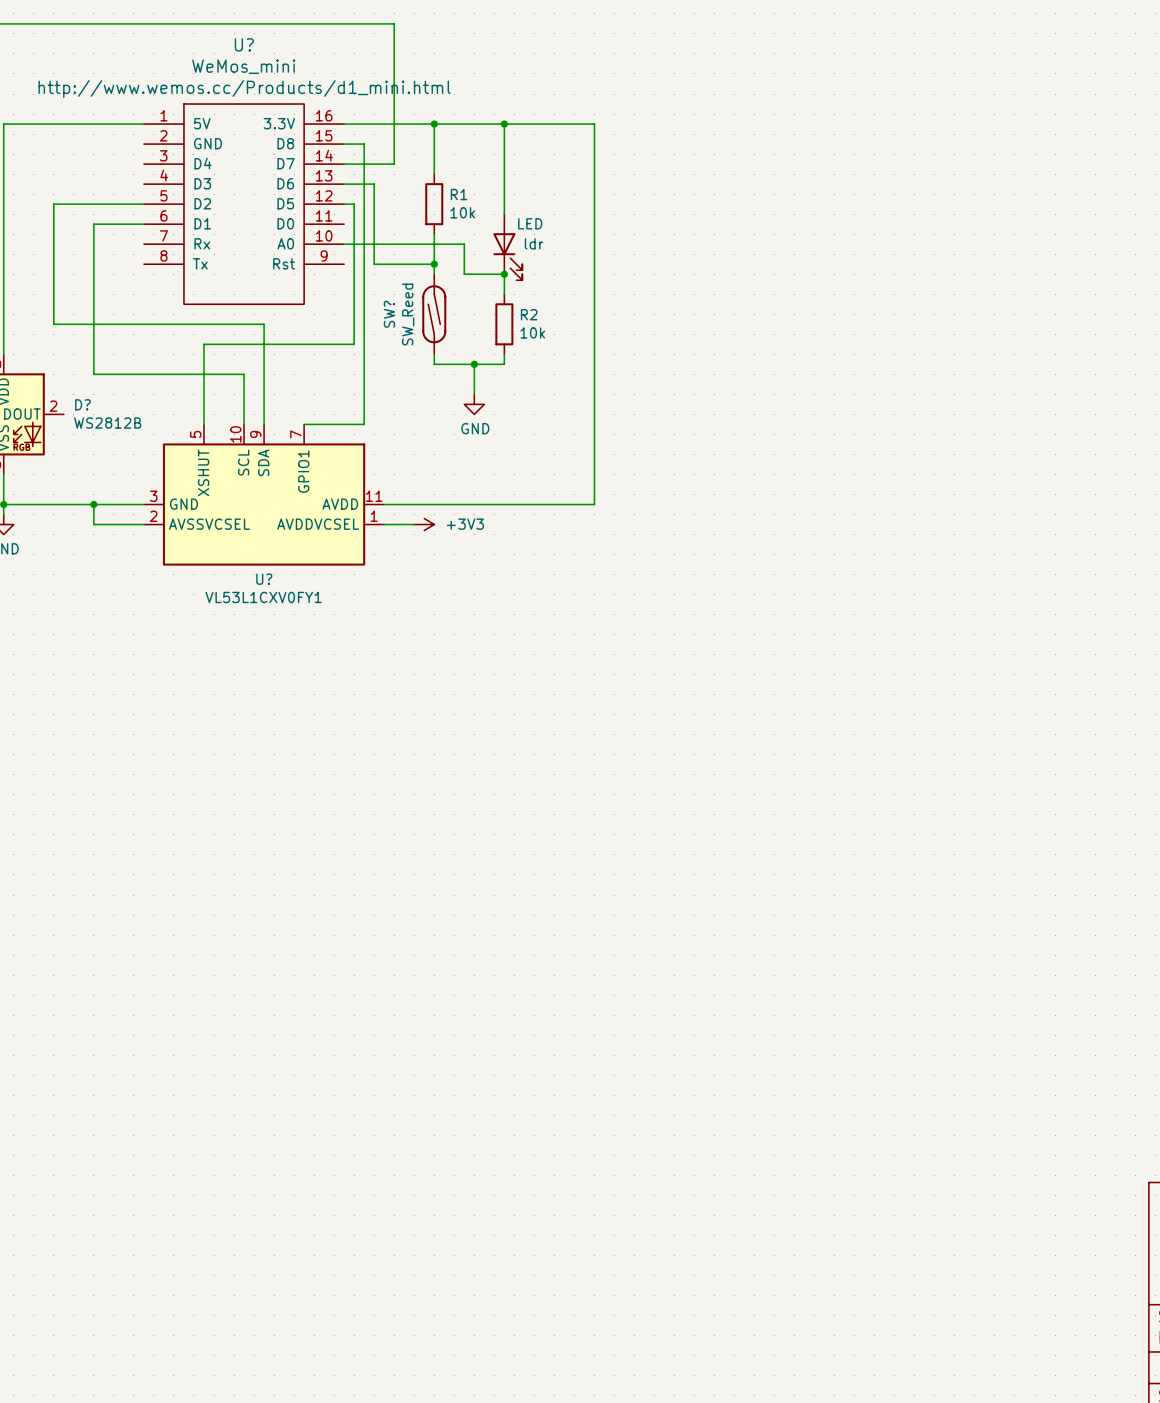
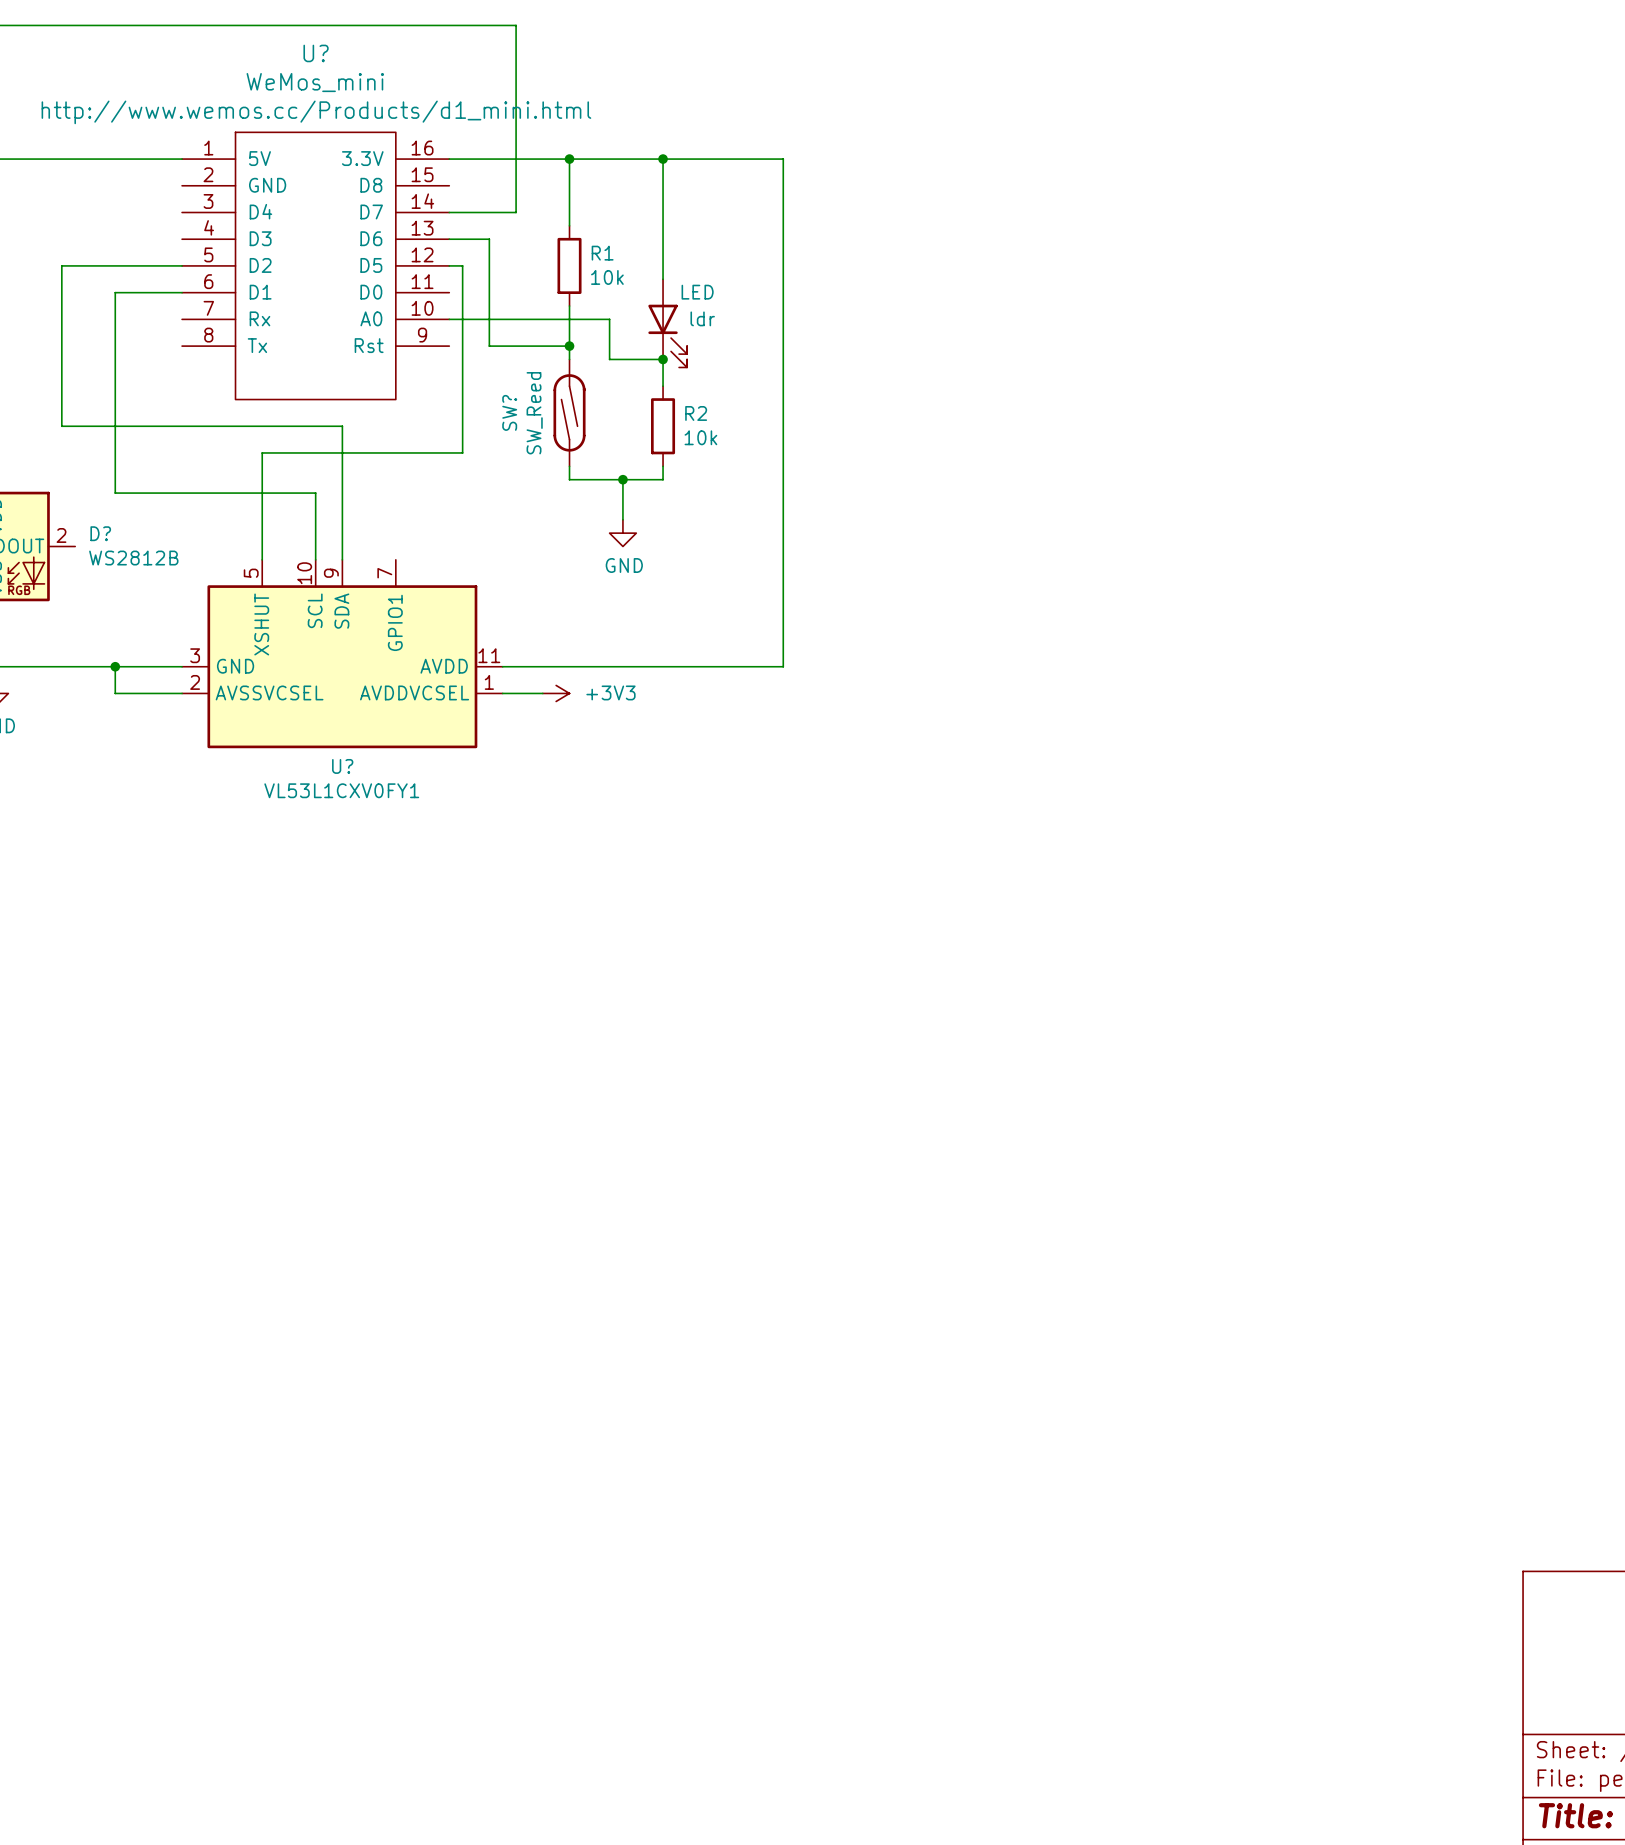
wire: (344, 144) (364, 144) (364, 424) (304, 424) -> none

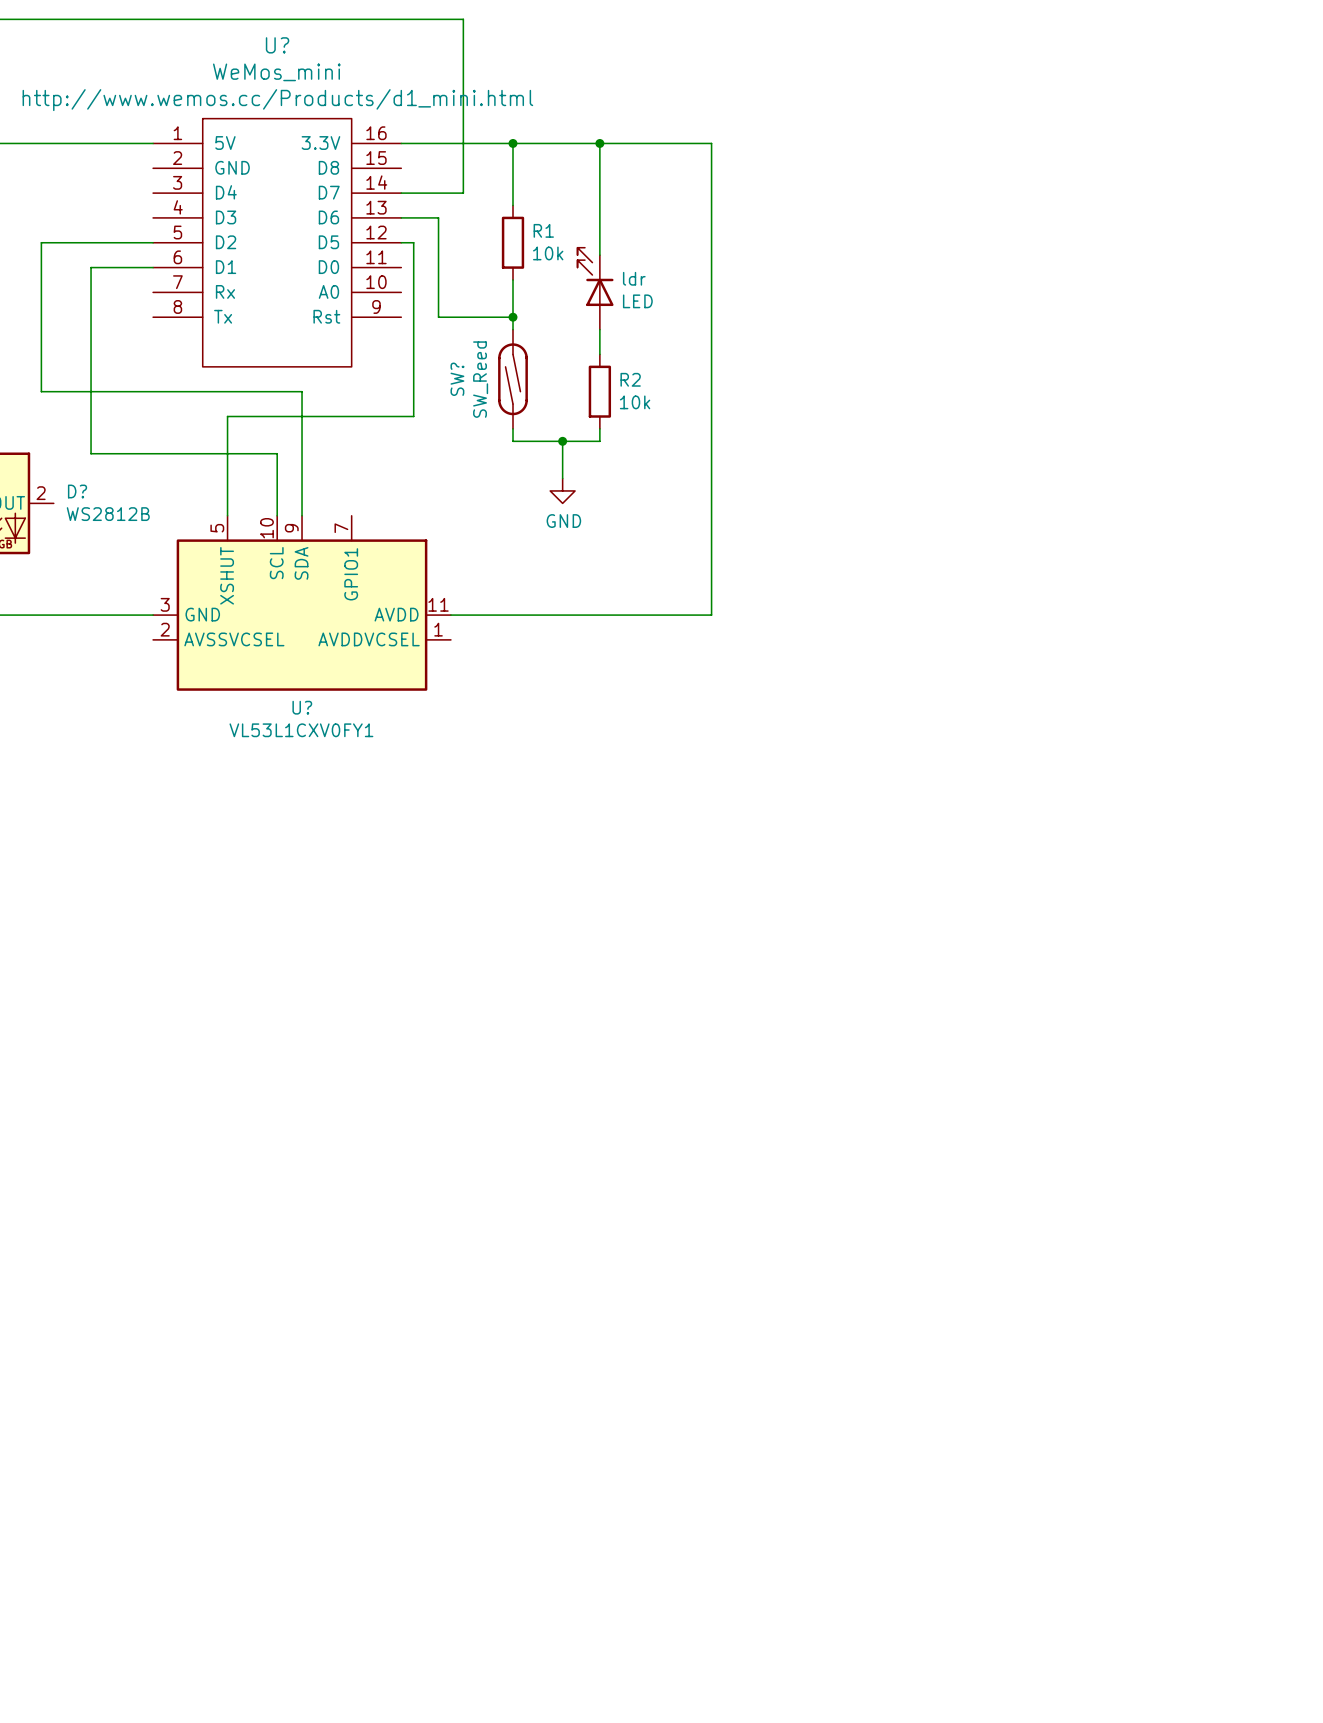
ldr value position: LED (697, 292) -> LED (637, 301)
wire: (449, 319) (609, 319) (609, 359) (663, 359) -> none
ldr rotation: 0° (667, 336) -> 180° (595, 276)
junction: (663, 359) -> none
wire: (115, 666) (115, 693) (182, 693) -> none
junction: (115, 666) -> none
wire: (502, 693) (542, 693) -> none
power symbol: +3V3 (556, 693) -> none

